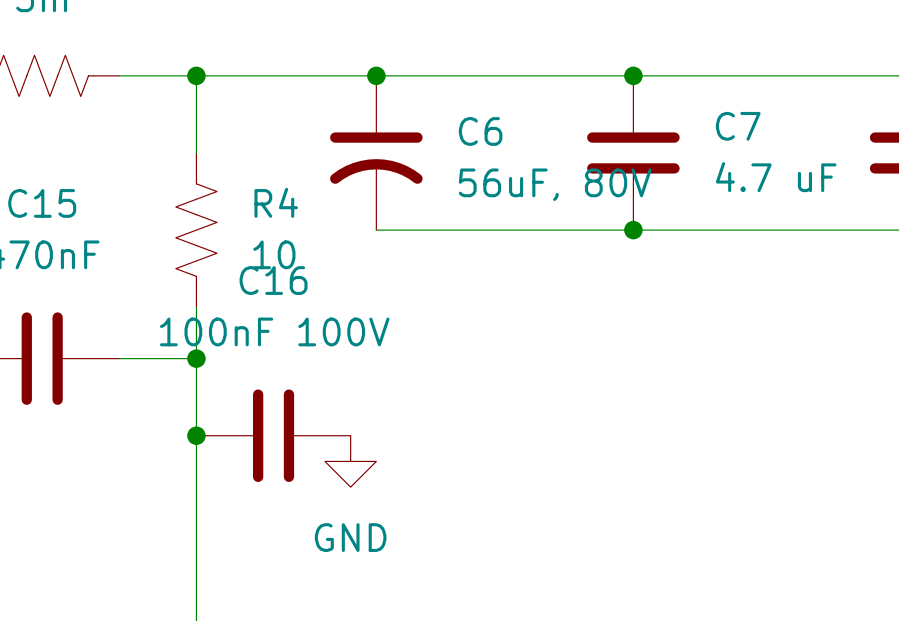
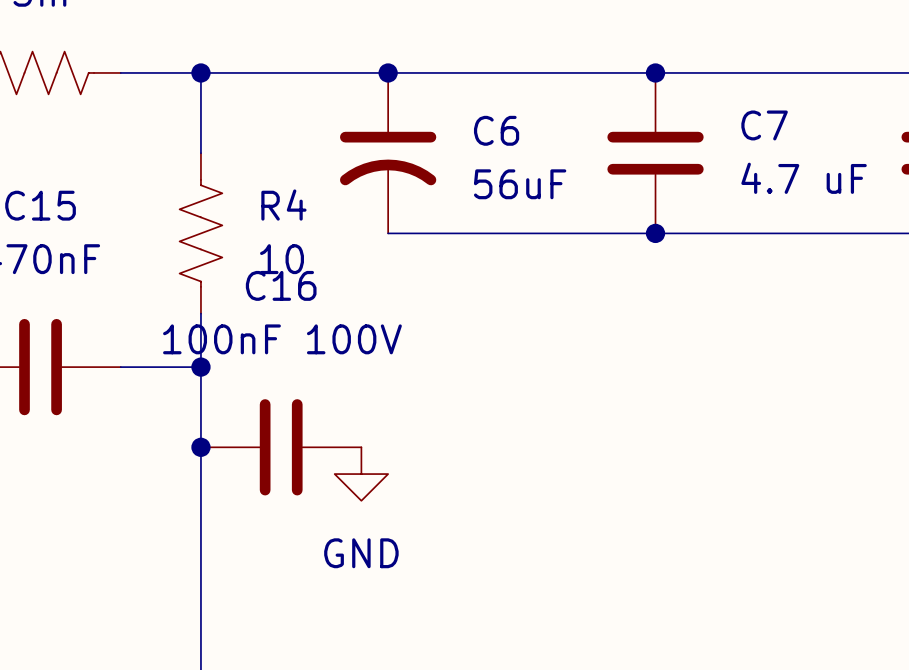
C6 value: 56uF, 80V (555, 184) -> 56uF (520, 184)

